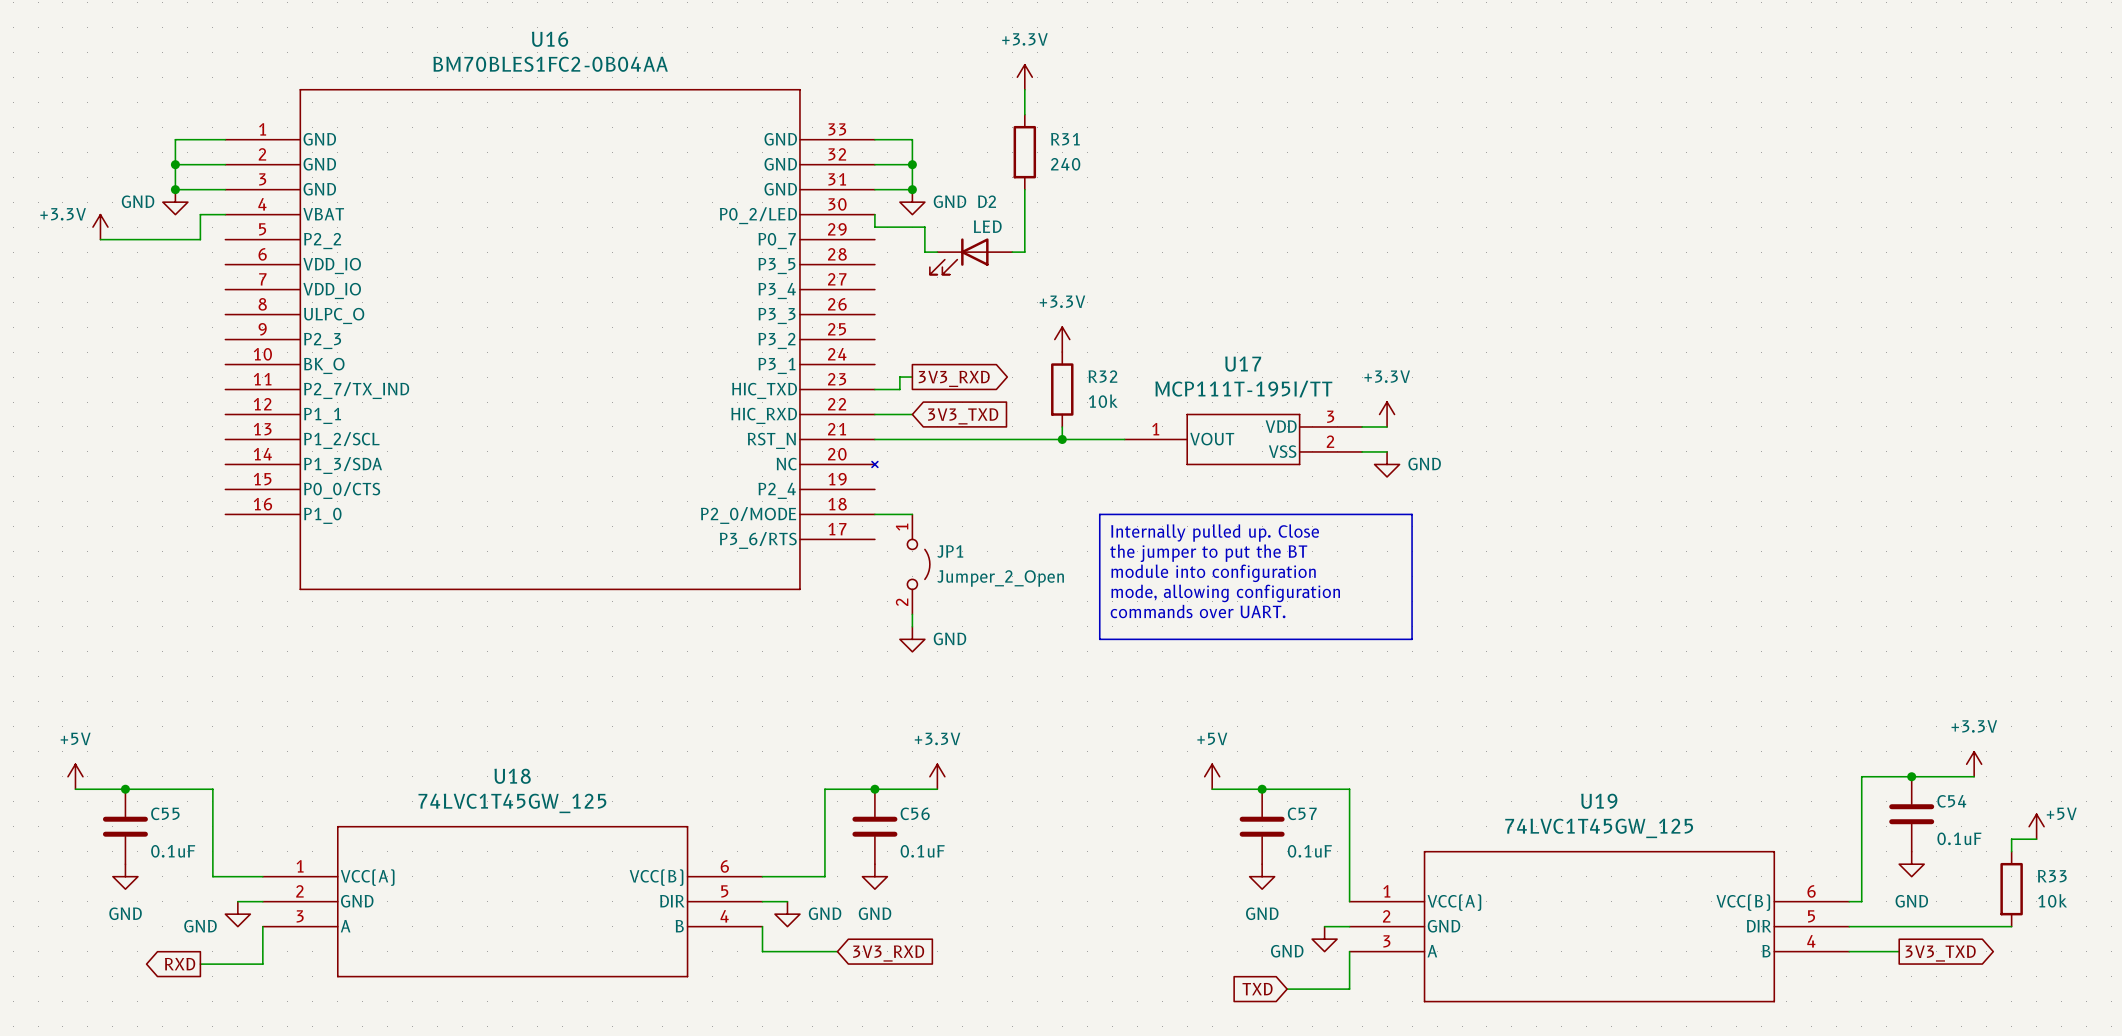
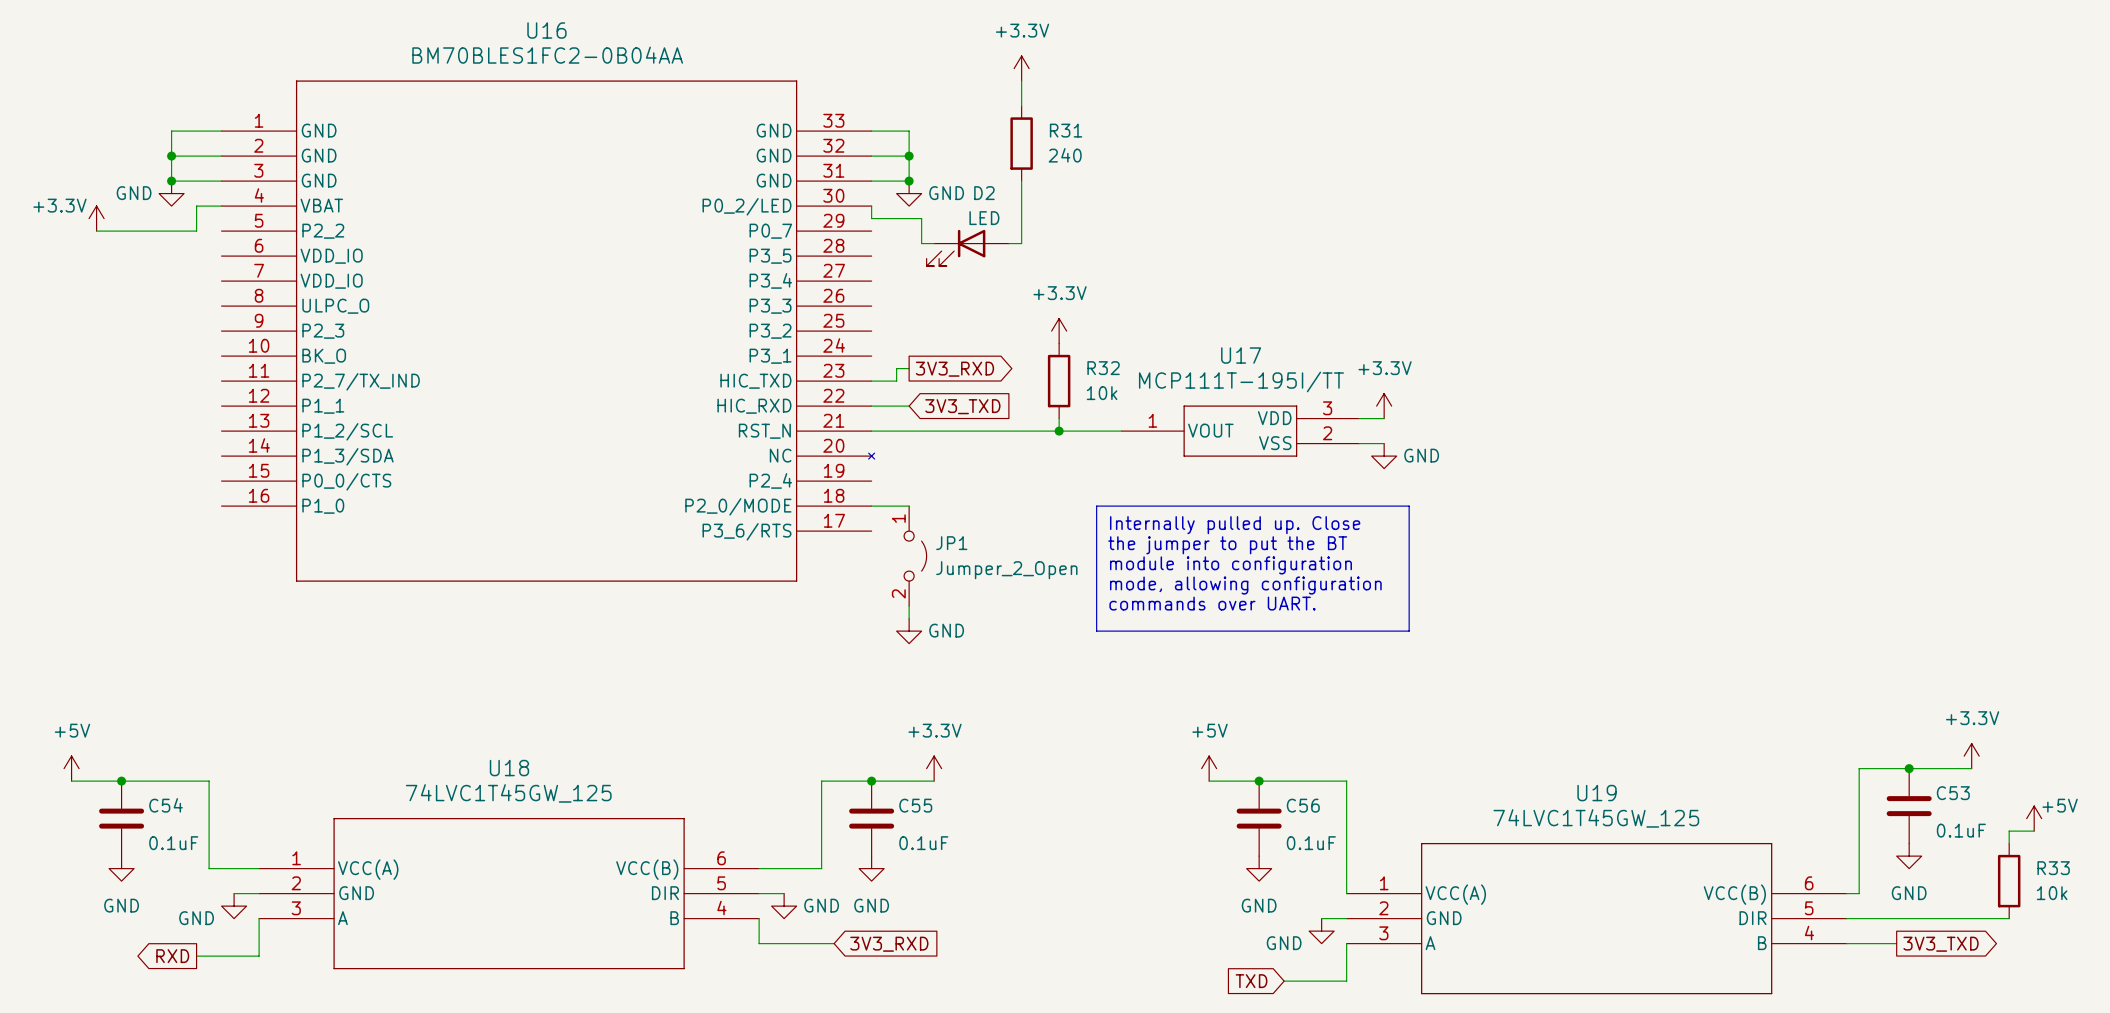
C54 name: C54 (1951, 801) -> C53 (1953, 793)
C55 name: C55 (165, 813) -> C54 (166, 805)
C56 name: C56 (915, 813) -> C55 (915, 805)
C57 name: C57 (1302, 813) -> C56 (1303, 805)

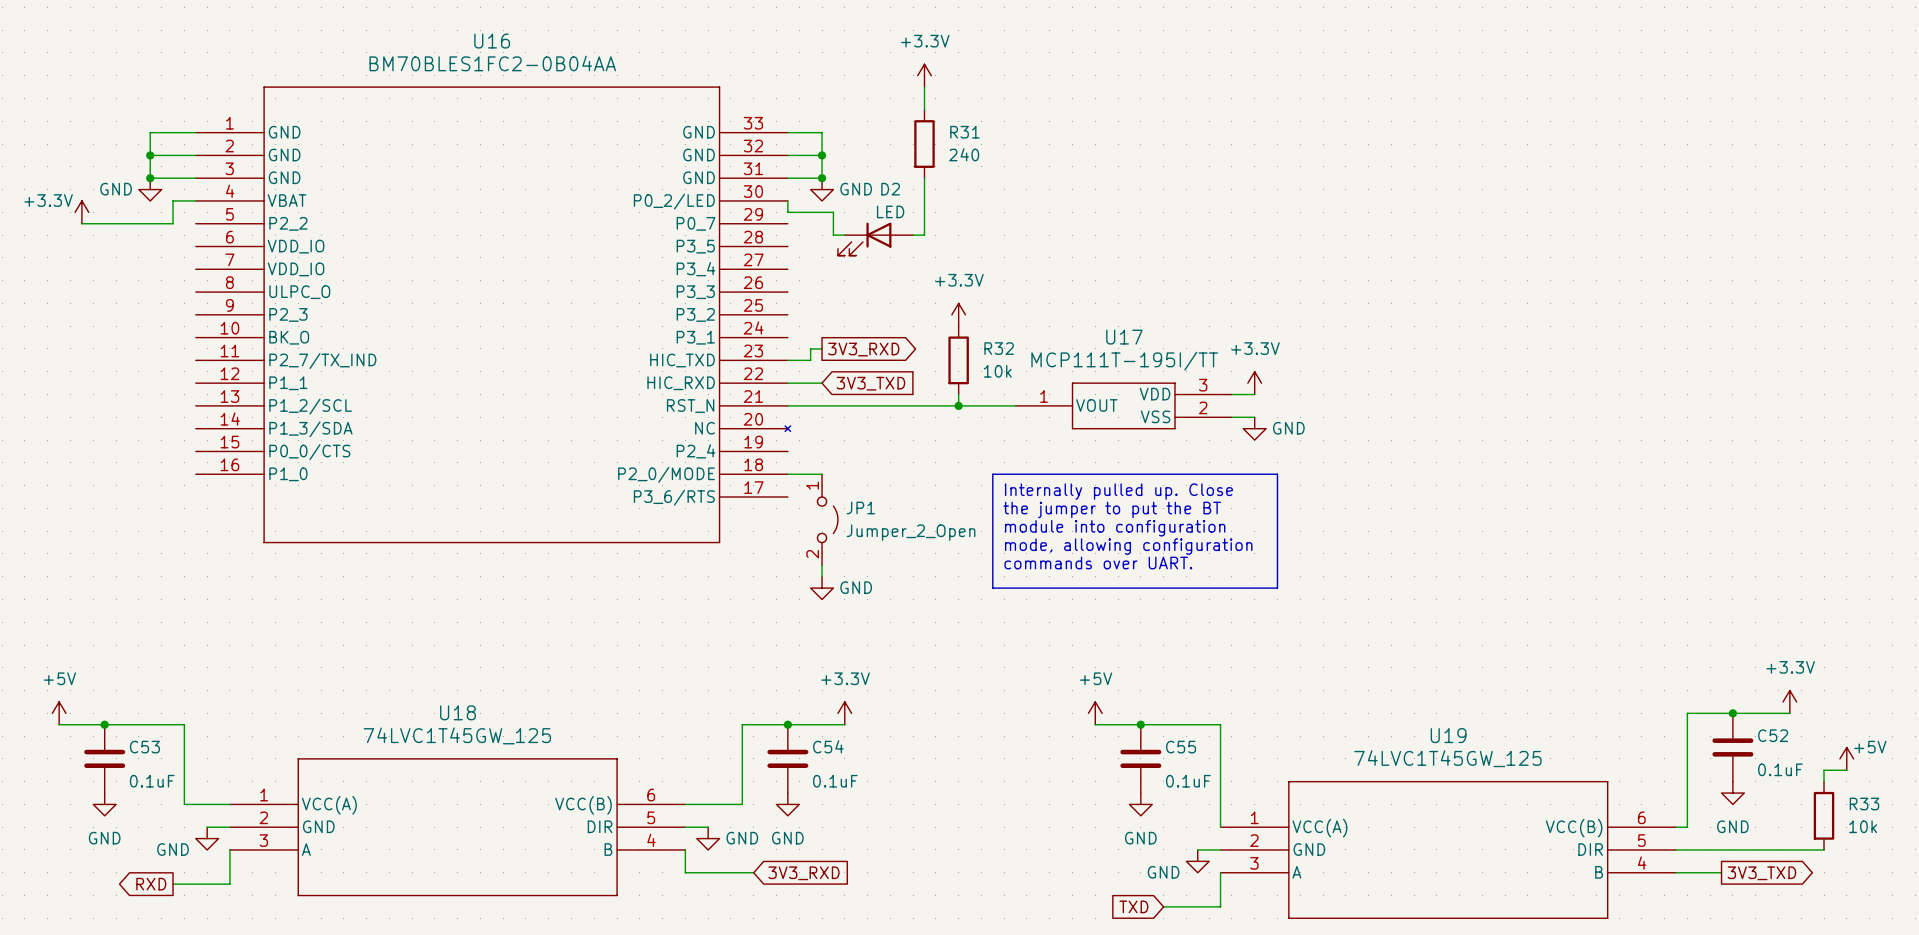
C53 name: C53 (1953, 793) -> C52 (1773, 735)
C54 name: C54 (166, 805) -> C53 (144, 747)
C55 name: C55 (915, 805) -> C54 (828, 746)
C56 name: C56 (1303, 805) -> C55 (1181, 747)

